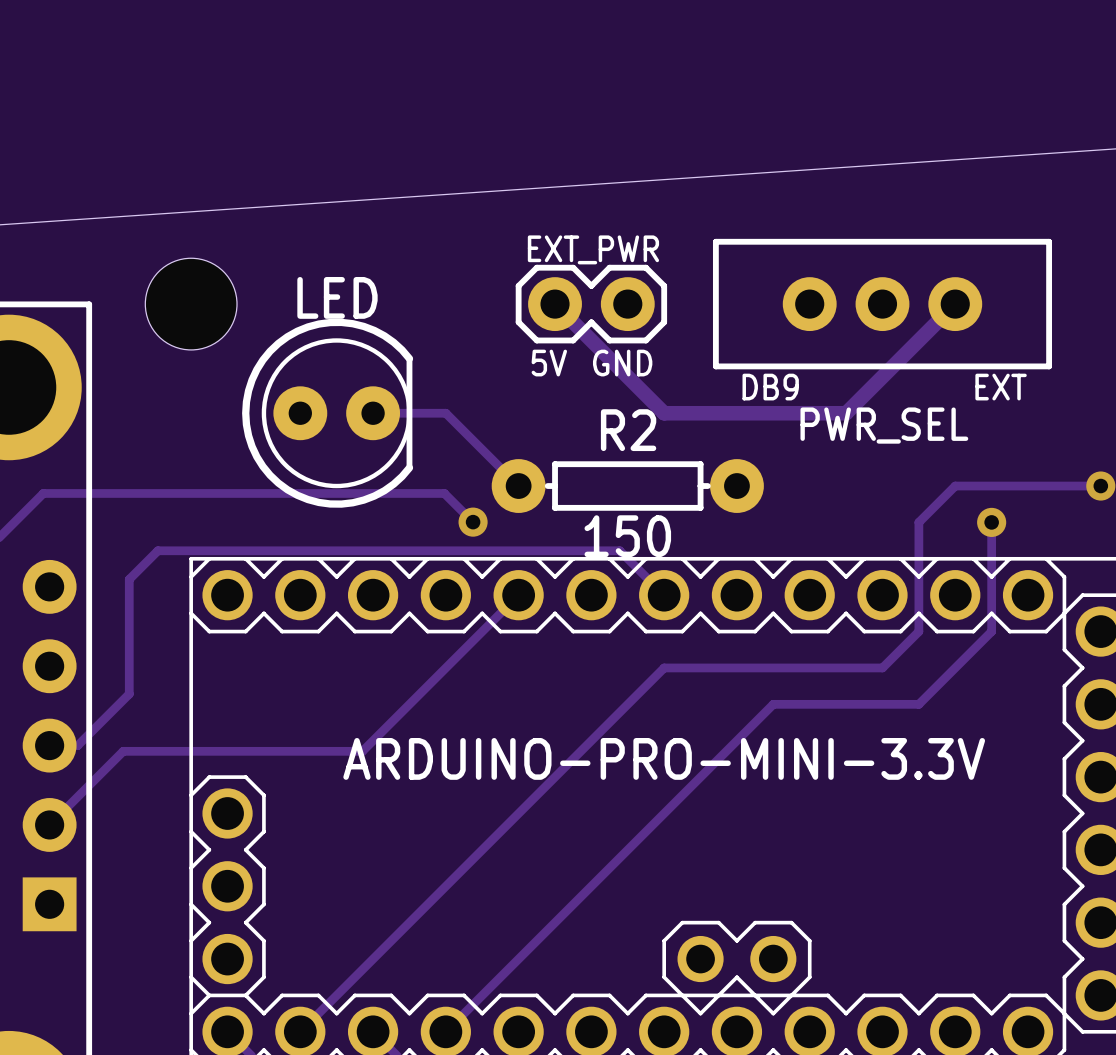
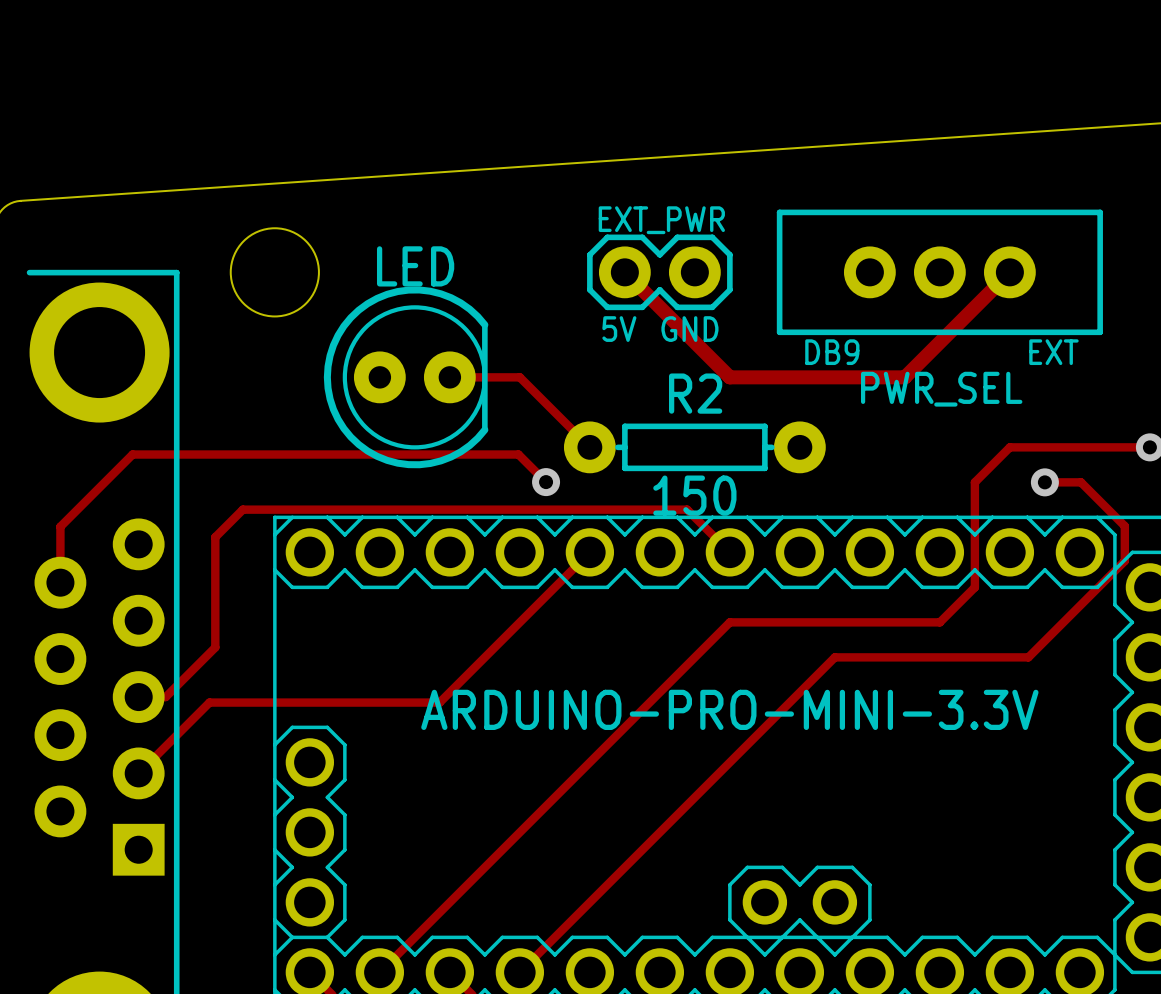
track: (991, 522) (991, 631) (918, 704) -> (1044, 482) (1081, 482) (1124, 526) (1124, 560) (1028, 657) (974, 657)

